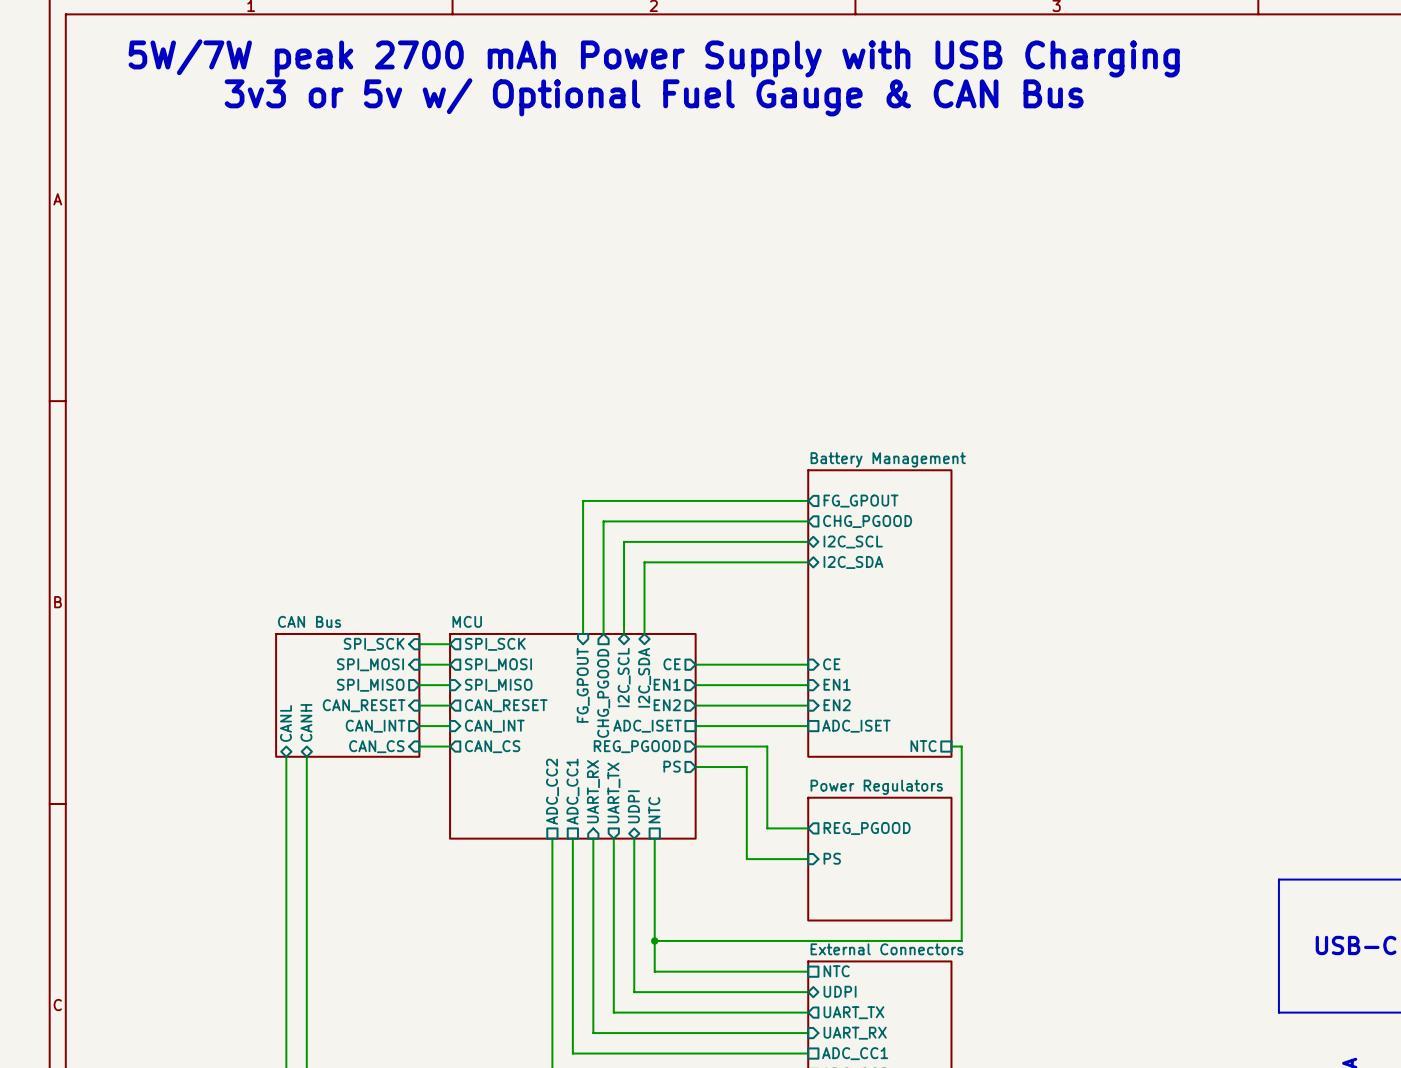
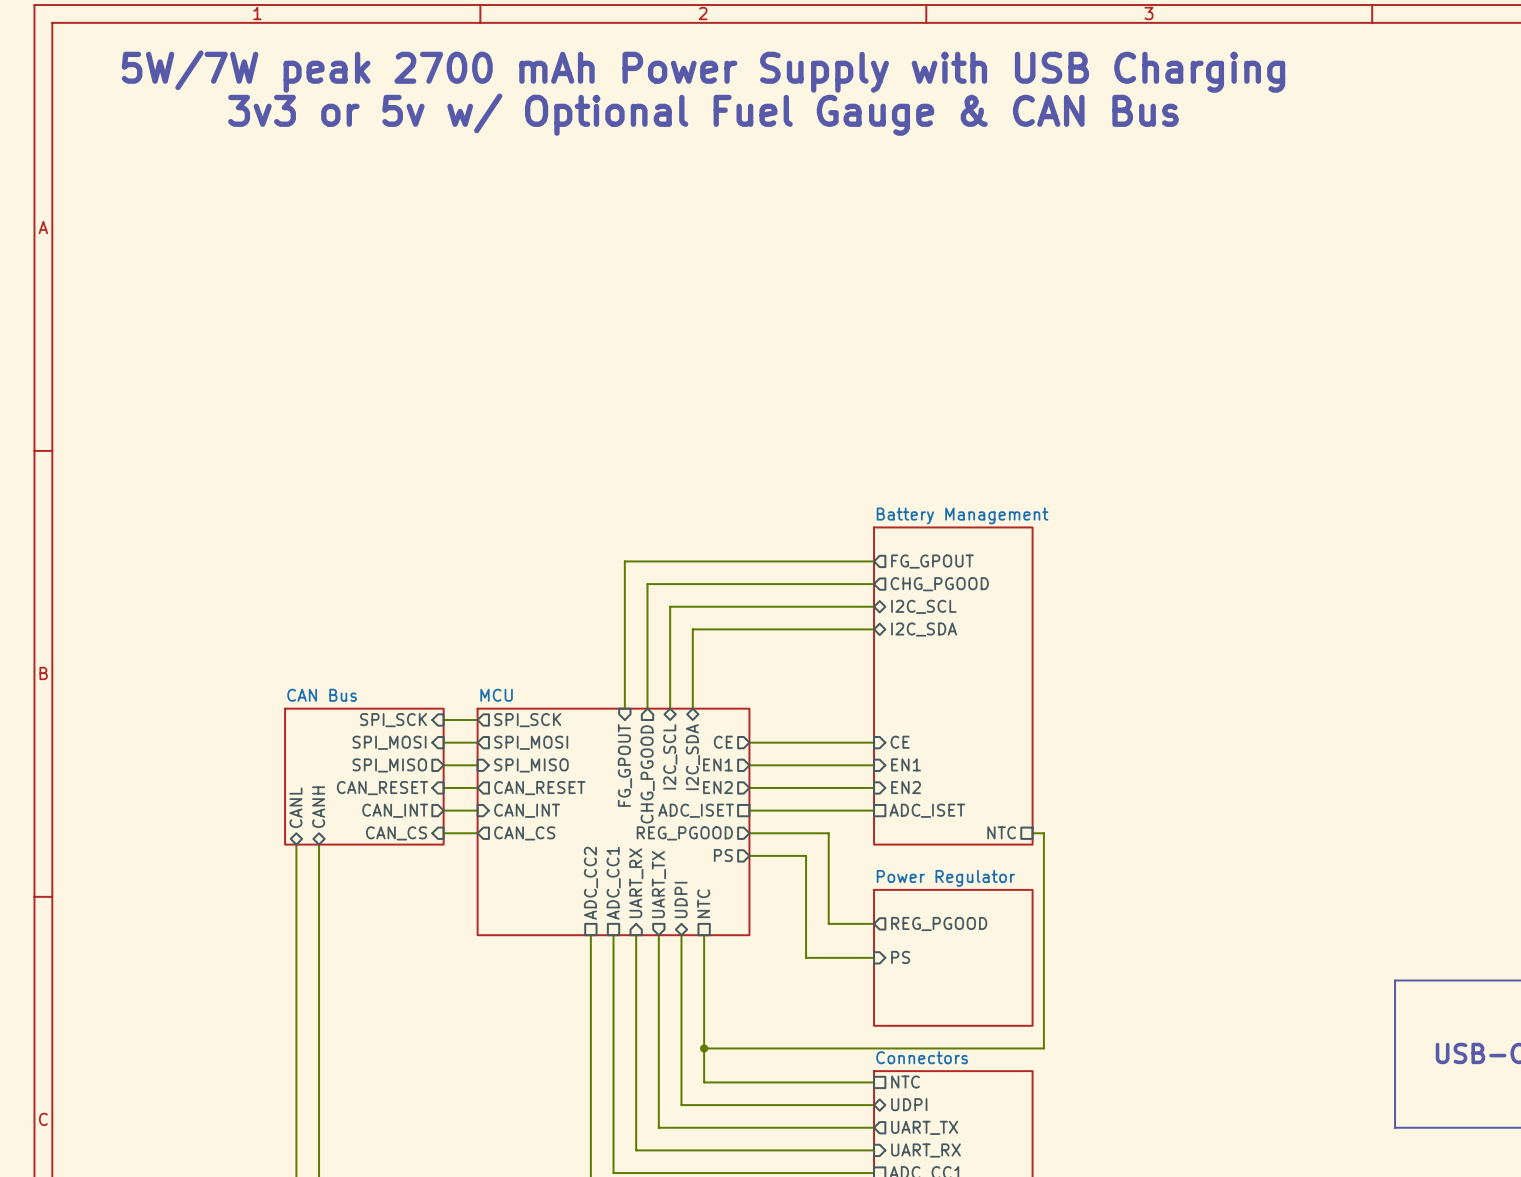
sheet Power Regulators name: Power Regulators (876, 787) -> Power Regulator (945, 878)
sheet External Connectors name: External Connectors (886, 949) -> Connectors (922, 1057)

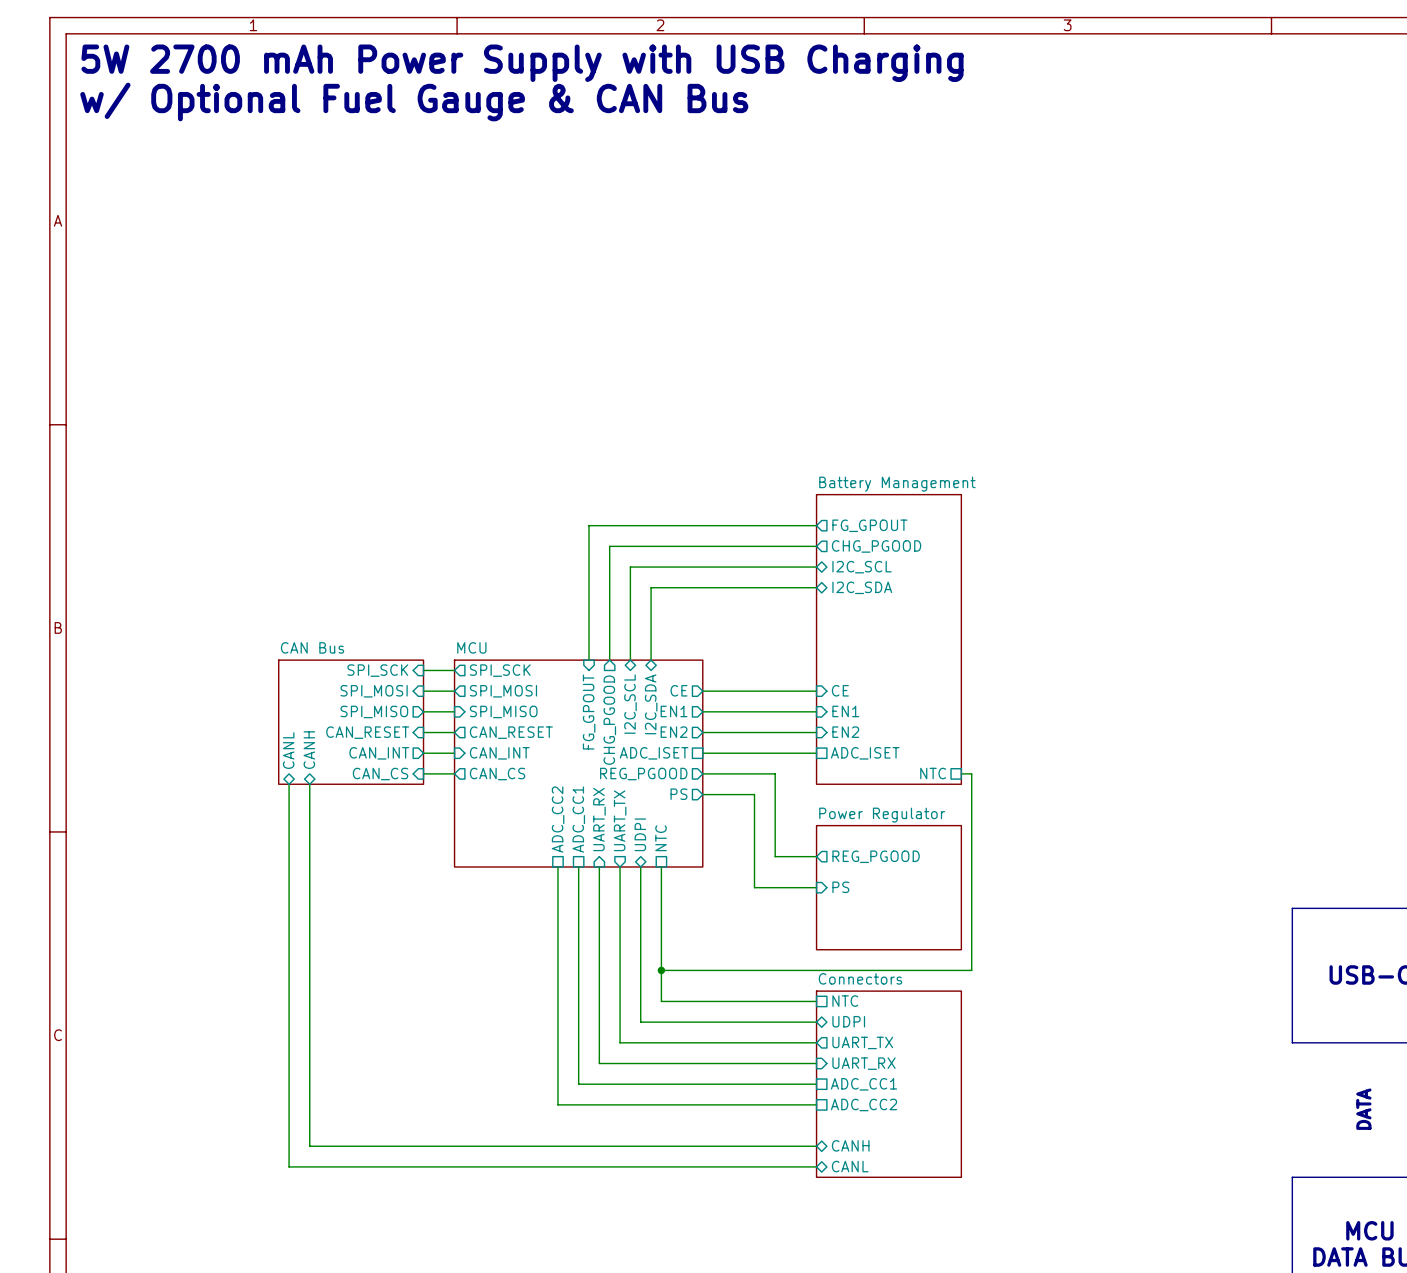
text: none -> 5W 2700 mAh Power Supply with USB Charging (522, 63)
text: 5W/7W peak 2700 mAh Power Supply with USB Charging (703, 71) -> none
text: none -> w/ Optional Fuel Gauge & CAN Bus (414, 101)
text: 3v3 or 5v w/ Optional Fuel Gauge & CAN Bus (703, 114) -> none

